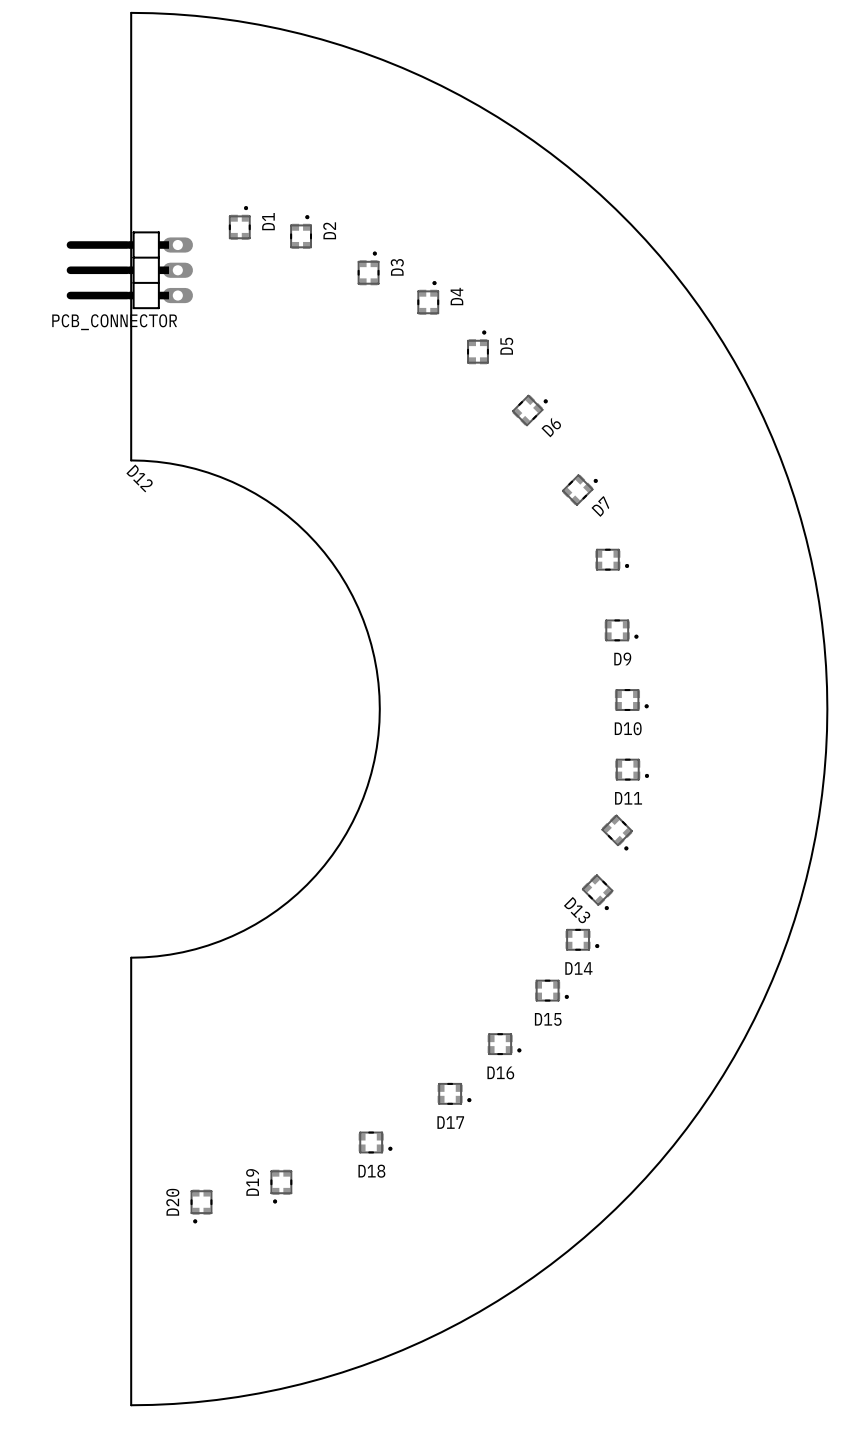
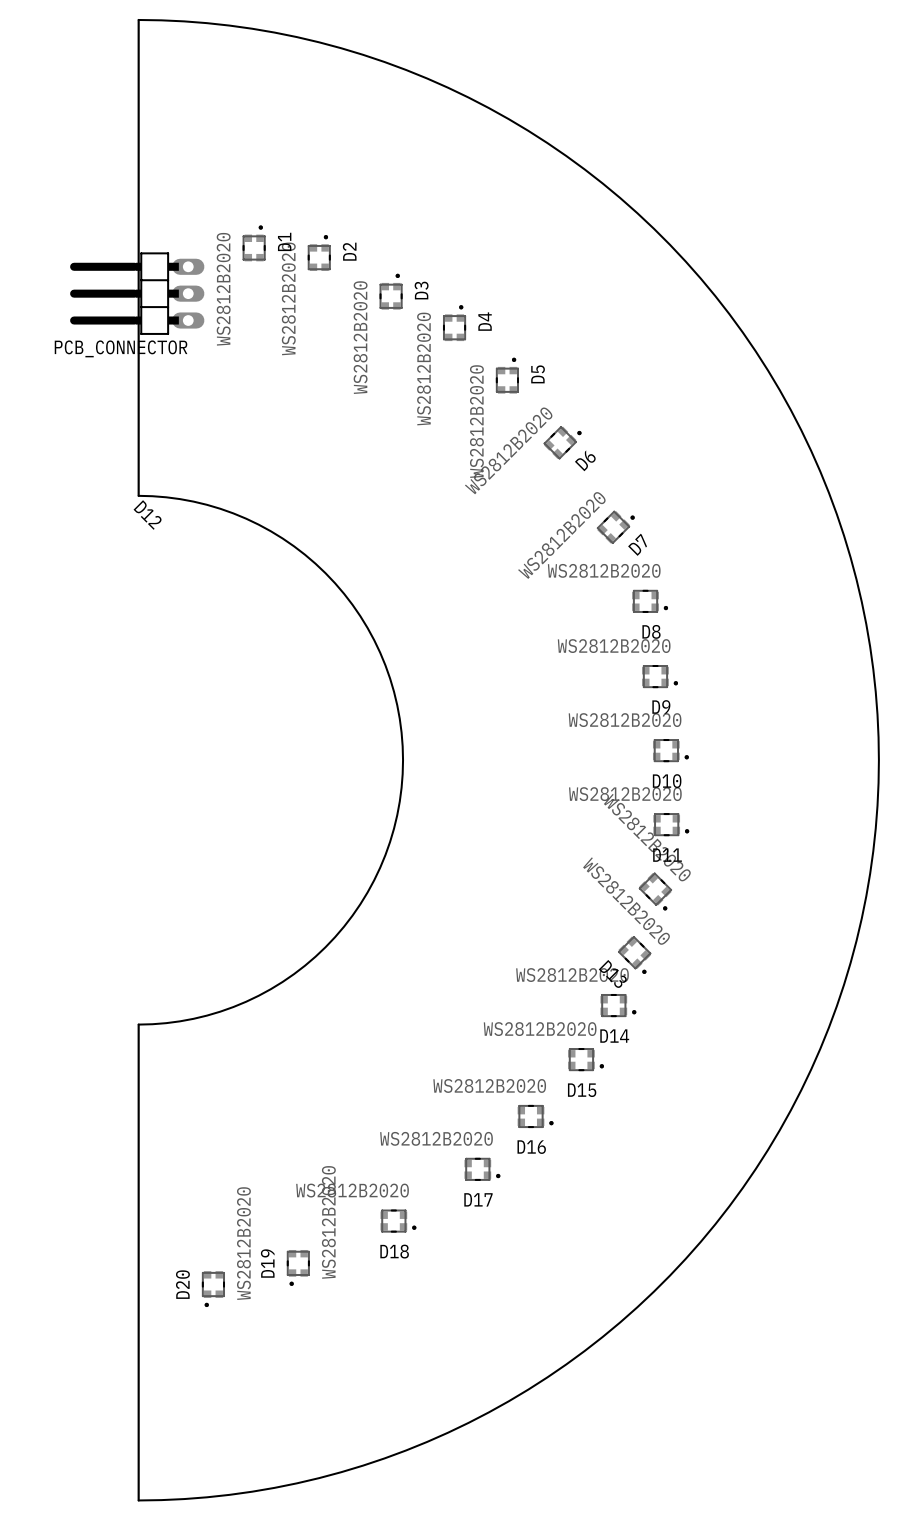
D1 value: none -> WS2812B2020 (223, 289)
D2 value: none -> WS2812B2020 (288, 298)
D3 value: none -> WS2812B2020 (360, 337)
D4 value: none -> WS2812B2020 (424, 369)
D5 value: none -> WS2812B2020 (476, 421)
D6 value: none -> WS2812B2020 (508, 450)
D7 value: none -> WS2812B2020 (561, 535)
D8 value: none -> WS2812B2020 (604, 570)
D8 name: none -> D8 (651, 631)
D9 value: none -> WS2812B2020 (614, 646)
D10 value: none -> WS2812B2020 (625, 720)
D11 value: none -> WS2812B2020 (625, 794)
D12 value: none -> WS2812B2020 (647, 837)
D13 value: none -> WS2812B2020 (626, 901)
D14 value: none -> WS2812B2020 (572, 975)
D15 value: none -> WS2812B2020 (540, 1029)
D16 value: none -> WS2812B2020 (489, 1085)
D17 value: none -> WS2812B2020 (436, 1138)
D18 value: none -> WS2812B2020 (352, 1190)
D19 value: none -> WS2812B2020 (328, 1222)
D20 value: none -> WS2812B2020 (243, 1243)

